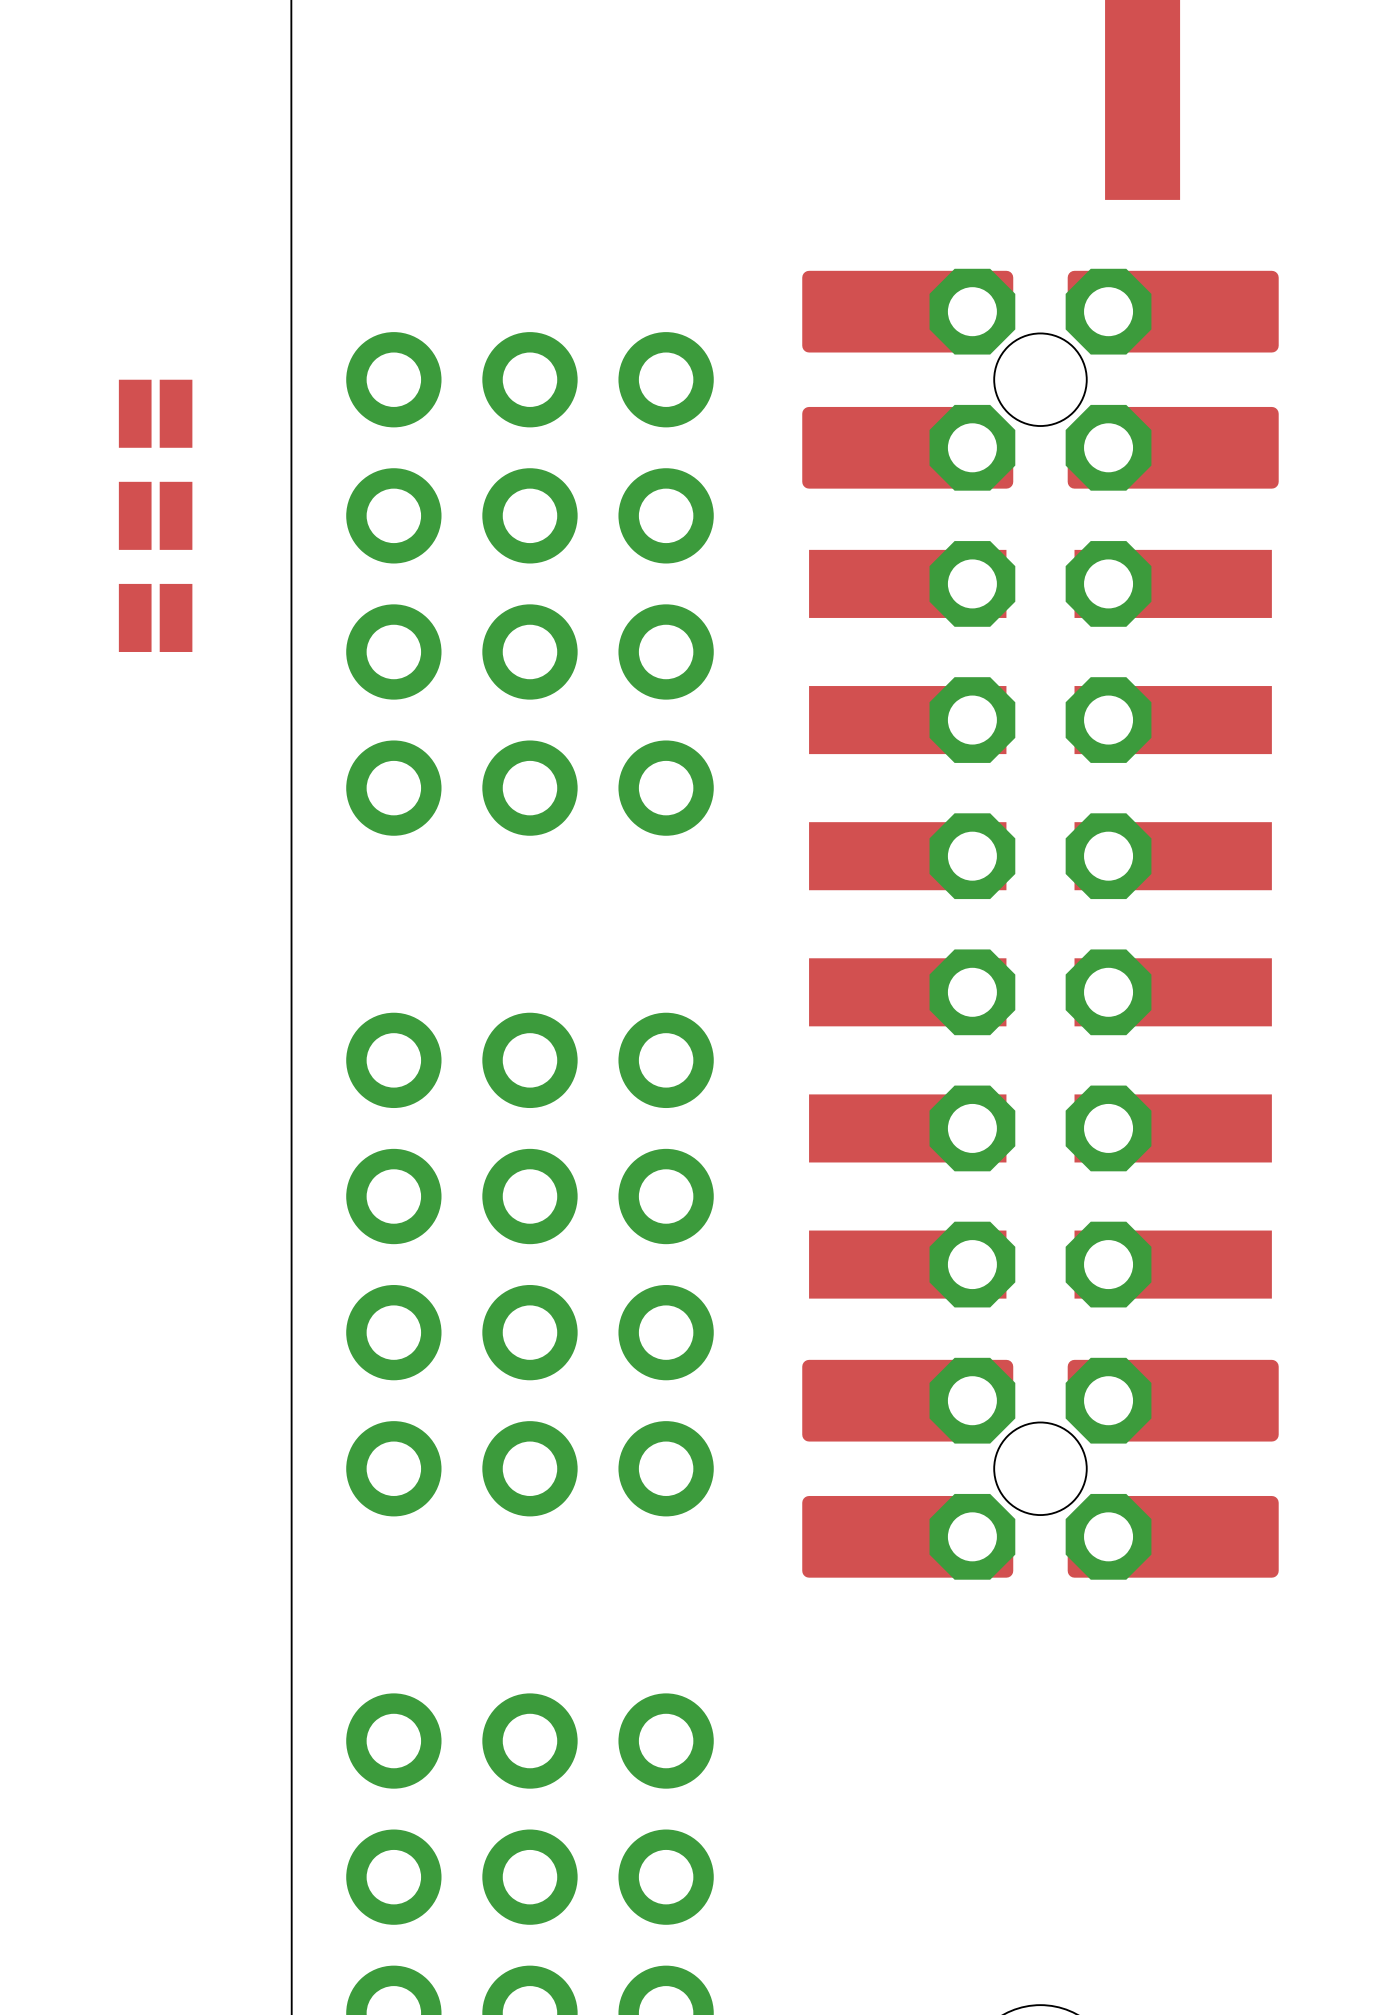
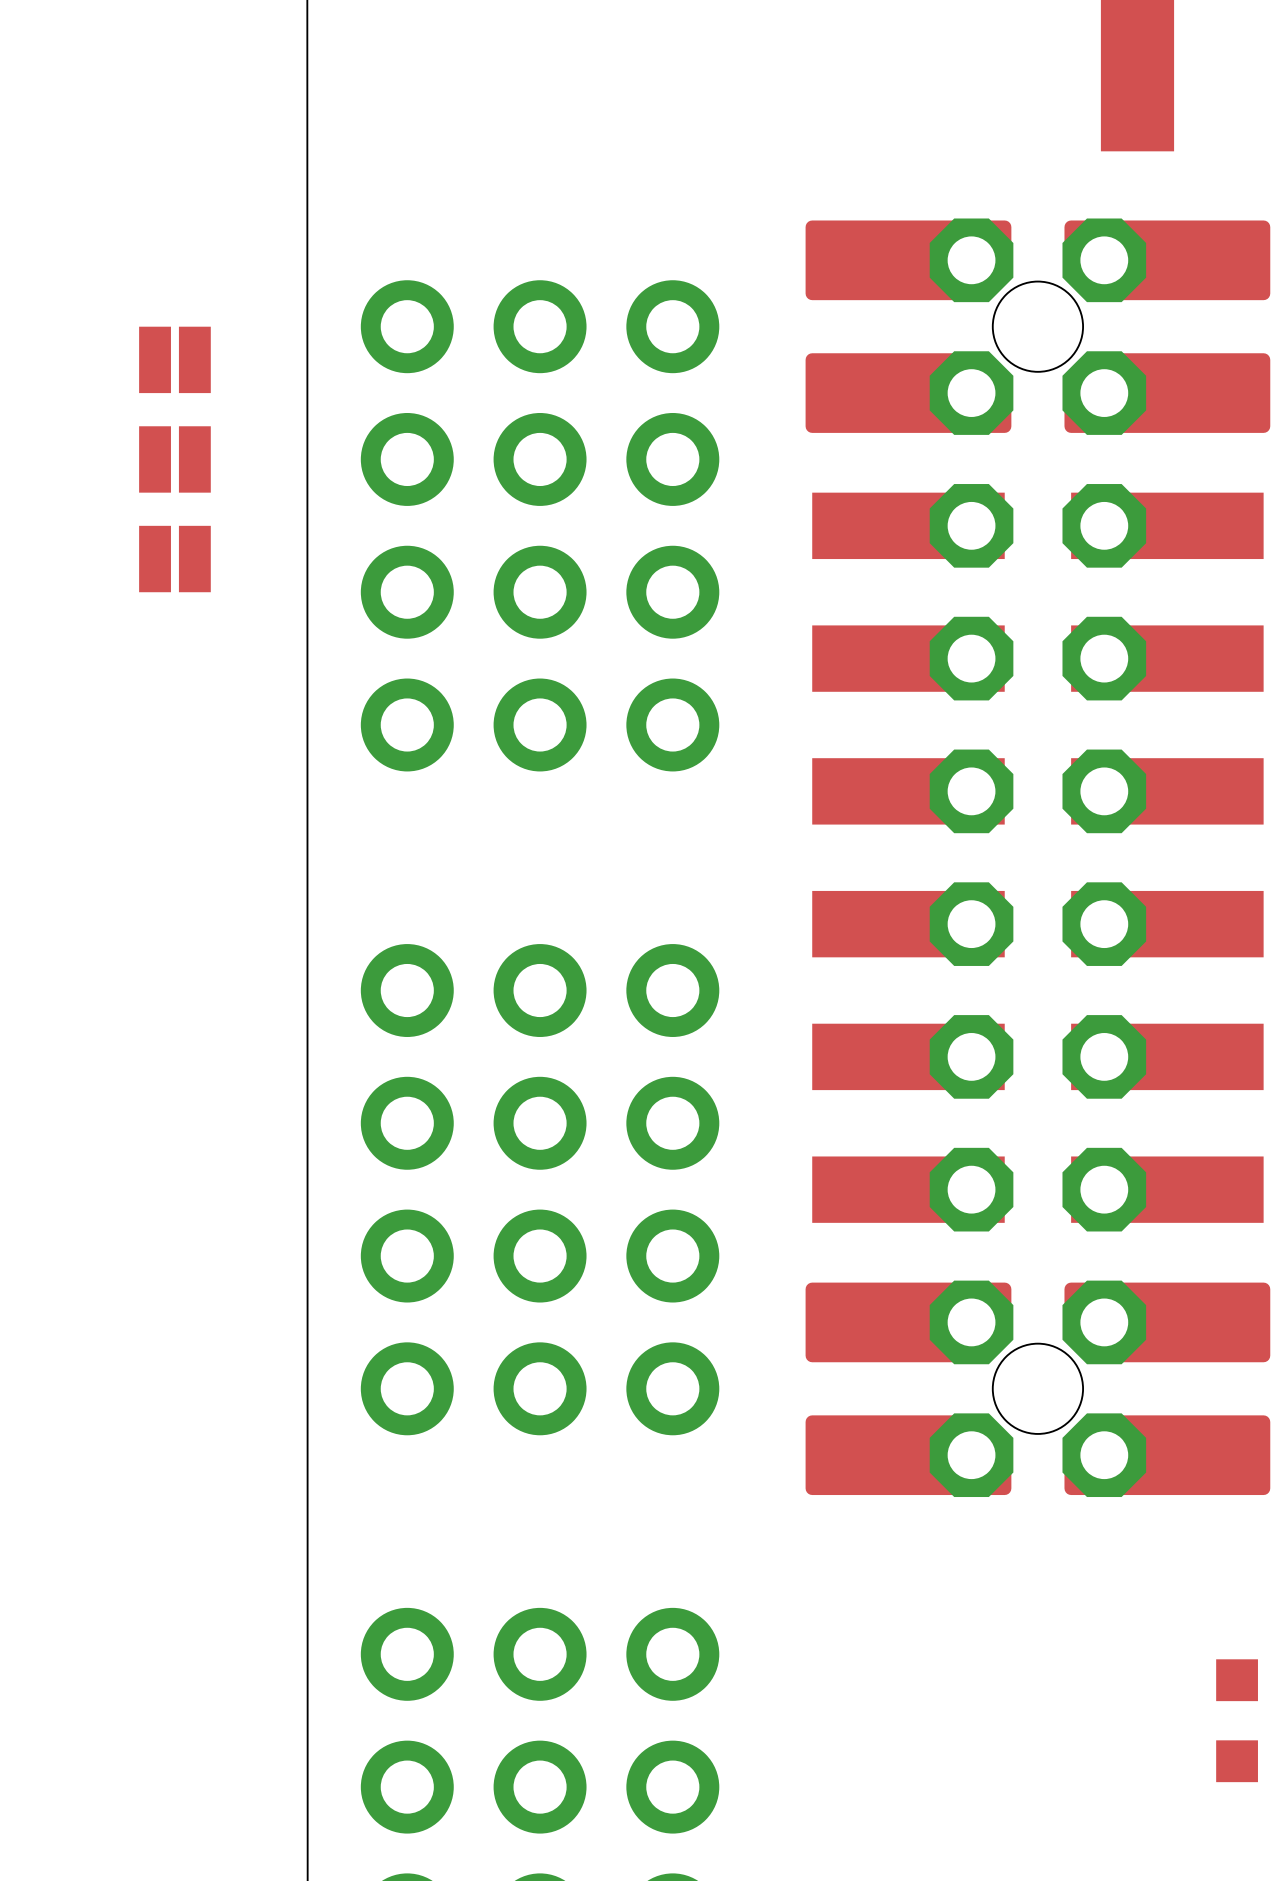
part: none -> (1237, 1720)

